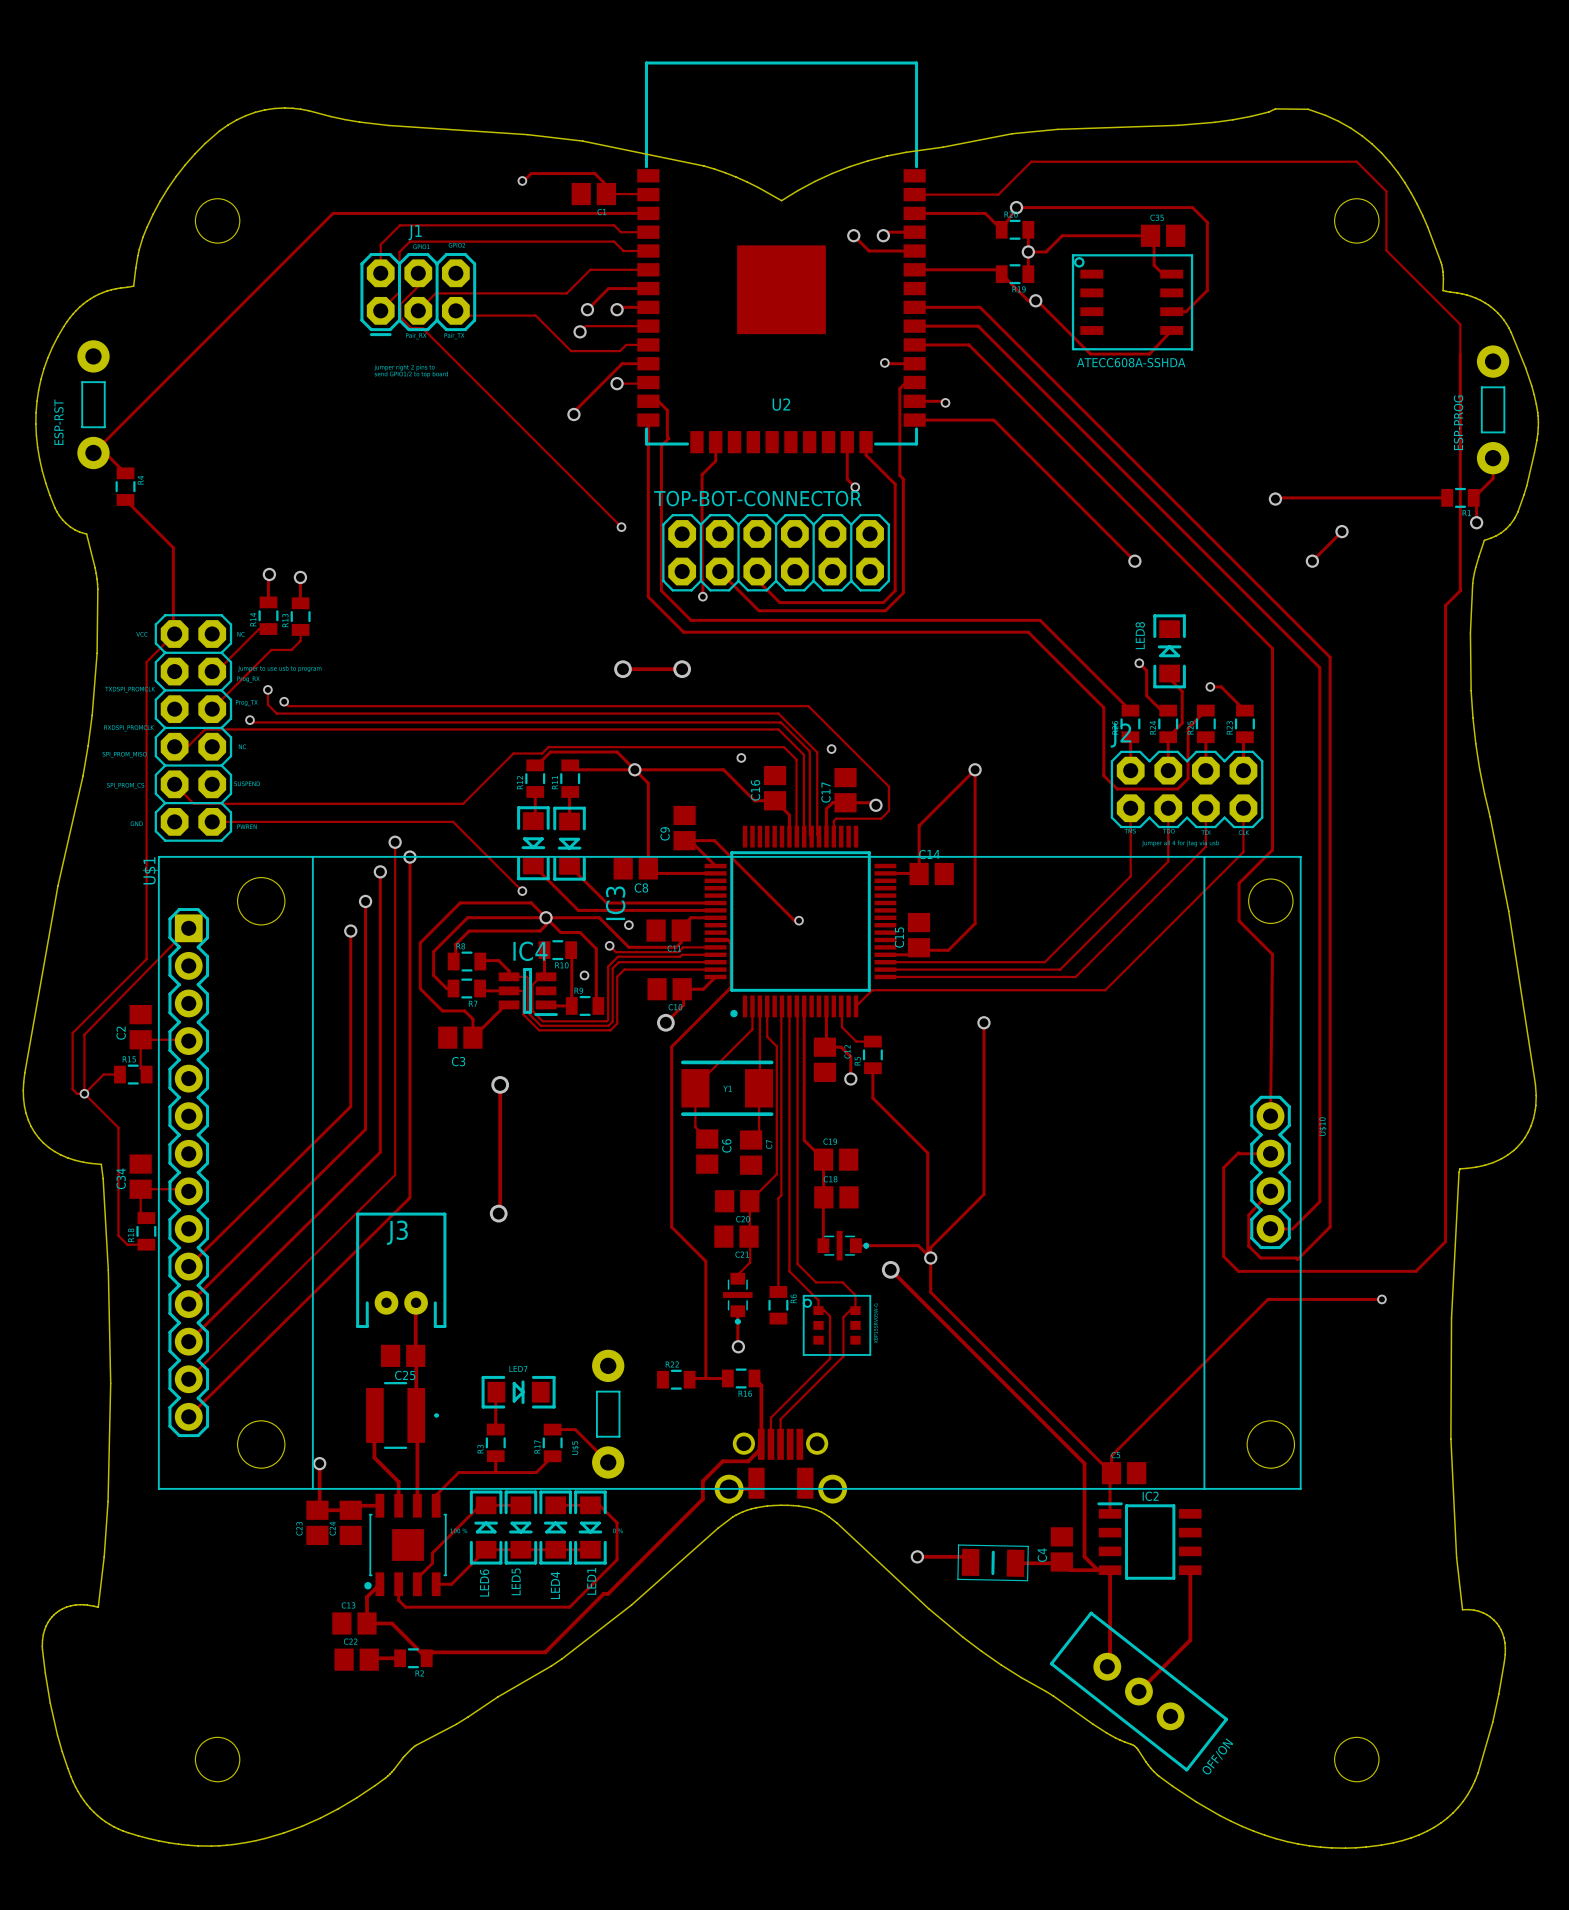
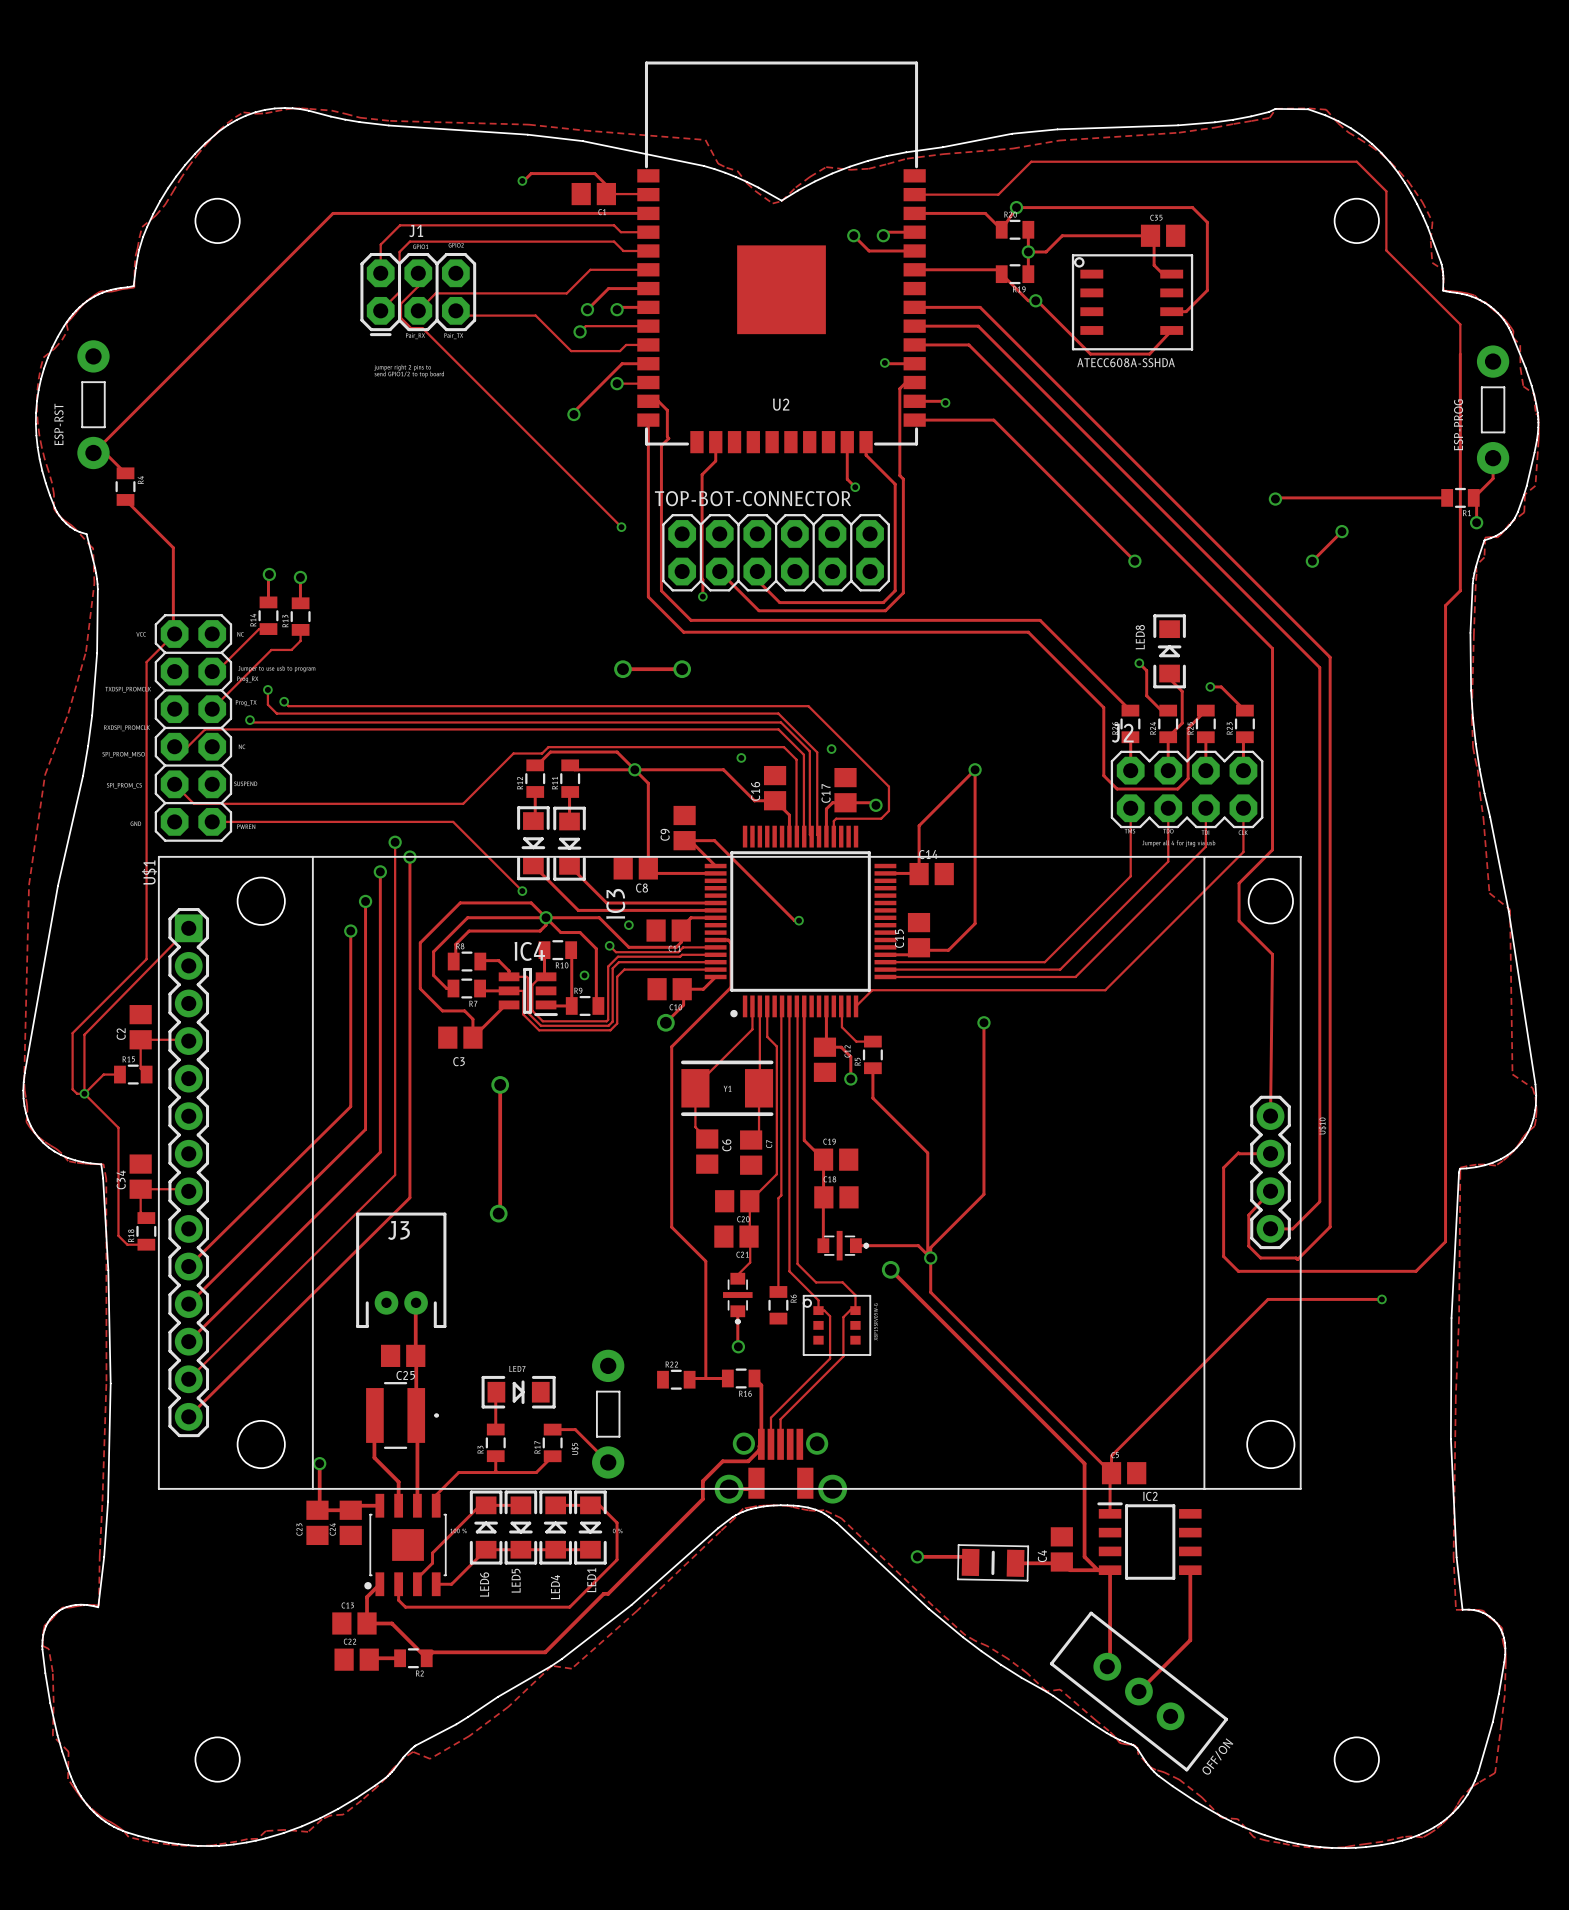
zone outline: none -> (301, 108) (265, 113) (243, 112) (219, 130) (188, 167) (164, 205) (142, 227) (135, 255) (134, 287) (112, 291) (101, 291) (83, 303) (66, 323) (67, 330) (61, 340) (43, 357) (38, 379) (37, 423) (41, 447) (52, 483) (53, 508) (93, 547) (94, 583) (86, 651) (68, 713) (45, 774) (29, 884) (24, 1072) (26, 1121) (30, 1127) (39, 1137) (61, 1153) (68, 1161) (103, 1164) (106, 1179) (106, 1381) (98, 1605) (62, 1607) (44, 1625) (42, 1639) (42, 1645) (48, 1648) (52, 1671) (52, 1735) (68, 1751) (67, 1779) (82, 1800) (96, 1813) (123, 1830) (128, 1837) (139, 1839) (178, 1845) (212, 1845) (257, 1838) (265, 1831) (308, 1831) (322, 1819) (330, 1815) (343, 1814) (377, 1786) (404, 1757) (413, 1751) (430, 1758) (469, 1736) (508, 1706) (551, 1665) (571, 1668) (637, 1610) (743, 1508) (777, 1505) (808, 1510) (824, 1510) (841, 1518) (965, 1635) (1007, 1658) (1046, 1691) (1060, 1689) (1108, 1730) (1119, 1743) (1133, 1744) (1138, 1748) (1137, 1753) (1151, 1767) (1179, 1779) (1201, 1797) (1221, 1817) (1237, 1819) (1253, 1837) (1299, 1846) (1330, 1847) (1382, 1841) (1403, 1836) (1422, 1837) (1435, 1829) (1447, 1818) (1471, 1787) (1495, 1772) (1504, 1695) (1505, 1655) (1502, 1628) (1483, 1610) (1455, 1609) (1453, 1555) (1460, 1167) (1476, 1164) (1495, 1165) (1502, 1160) (1534, 1126) (1536, 1110) (1532, 1088) (1512, 1074) (1510, 909) (1489, 893) (1483, 818) (1473, 747) (1471, 718) (1476, 565) (1484, 557) (1485, 537) (1497, 537) (1509, 523) (1524, 512) (1524, 494) (1535, 485) (1538, 415) (1535, 413) (1534, 394) (1523, 386) (1520, 368) (1520, 345) (1512, 337) (1513, 331) (1502, 317) (1474, 295) (1443, 290) (1442, 269) (1432, 262) (1430, 241) (1432, 222) (1422, 201) (1408, 181) (1390, 162) (1371, 146) (1348, 132) (1326, 109) (1275, 108) (1269, 117) (1178, 132) (1059, 140) (1013, 148) (906, 158) (868, 168) (850, 169) (826, 167) (795, 187) (781, 201) (772, 203) (746, 183) (737, 171) (718, 163) (705, 139) (528, 124) (390, 120) (360, 117) (331, 110) (301, 108)

